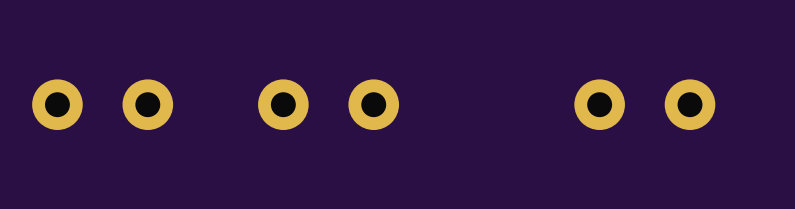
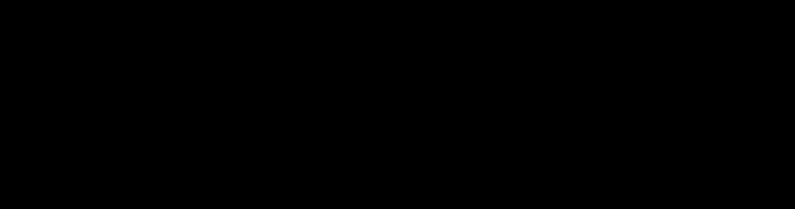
part: (102, 104) -> none
part: (328, 104) -> none
part: (644, 104) -> none

